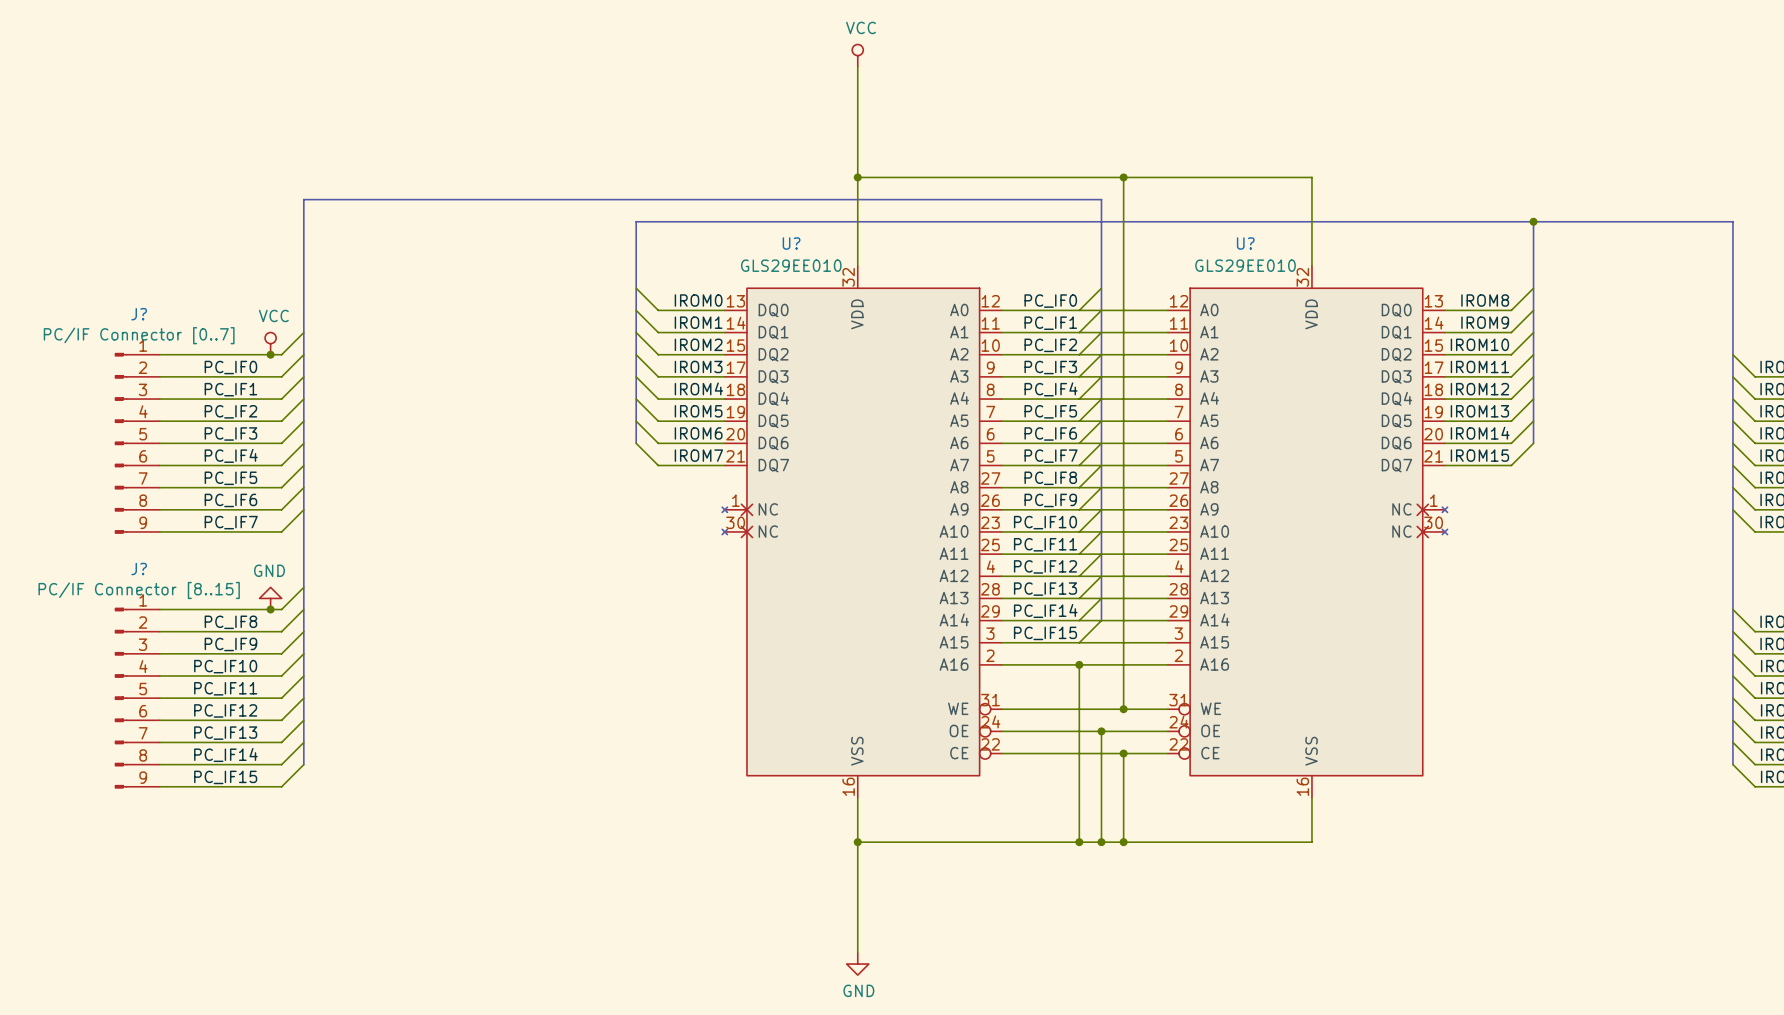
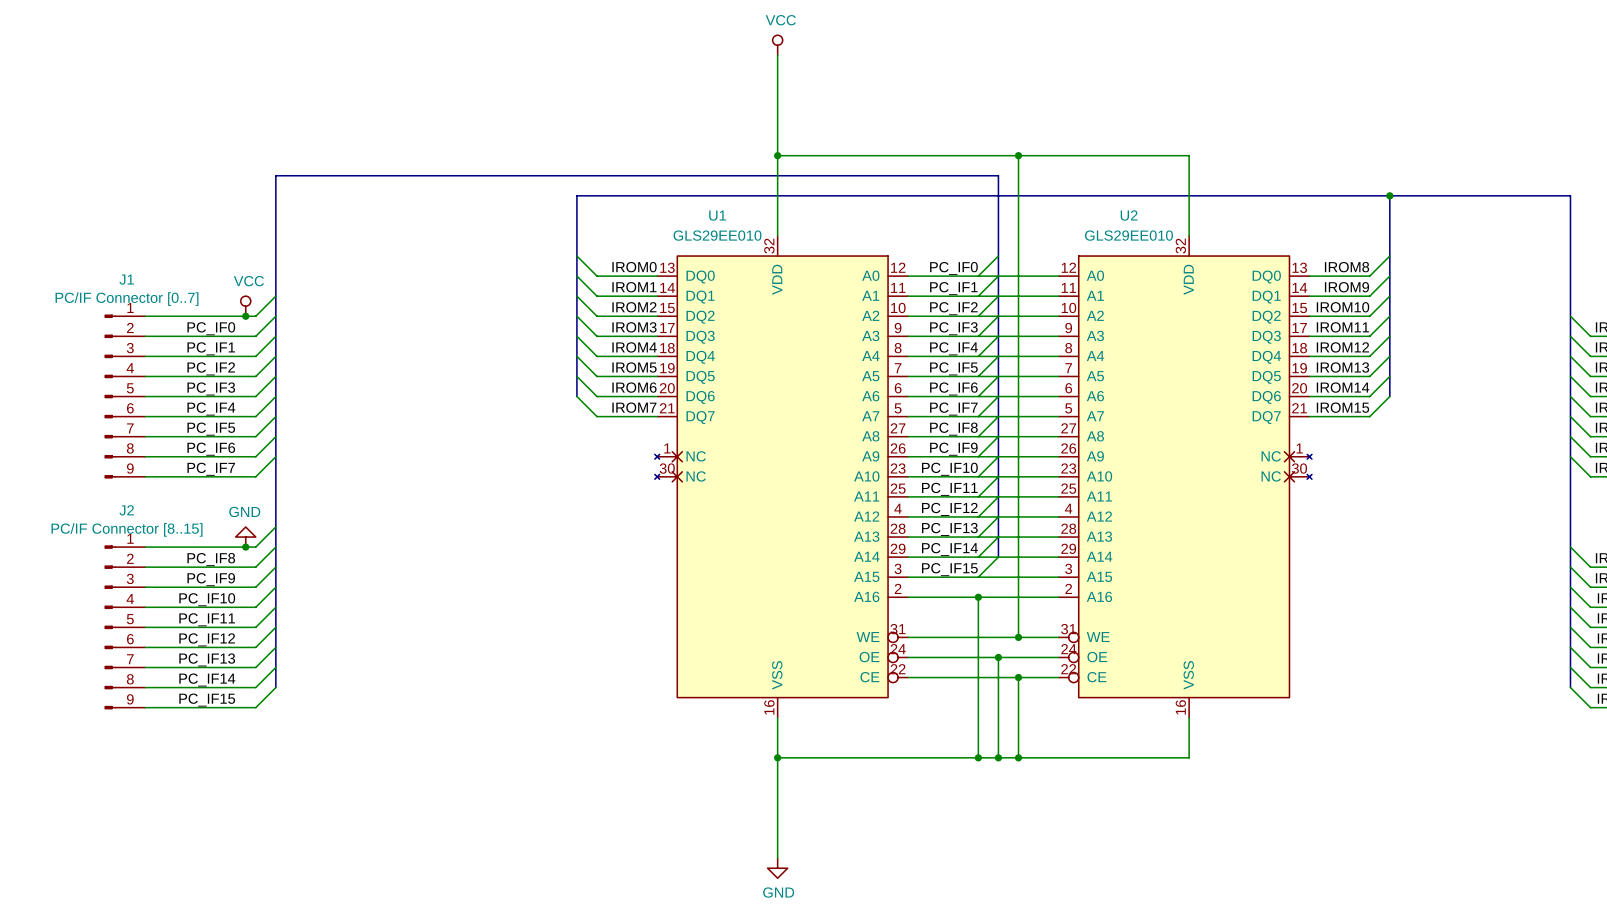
U? name: U? (791, 243) -> U1 (717, 215)
U? name: U? (1245, 243) -> U2 (1129, 215)
J? name: J? (139, 314) -> J1 (126, 279)
J? name: J? (139, 569) -> J2 (126, 510)

